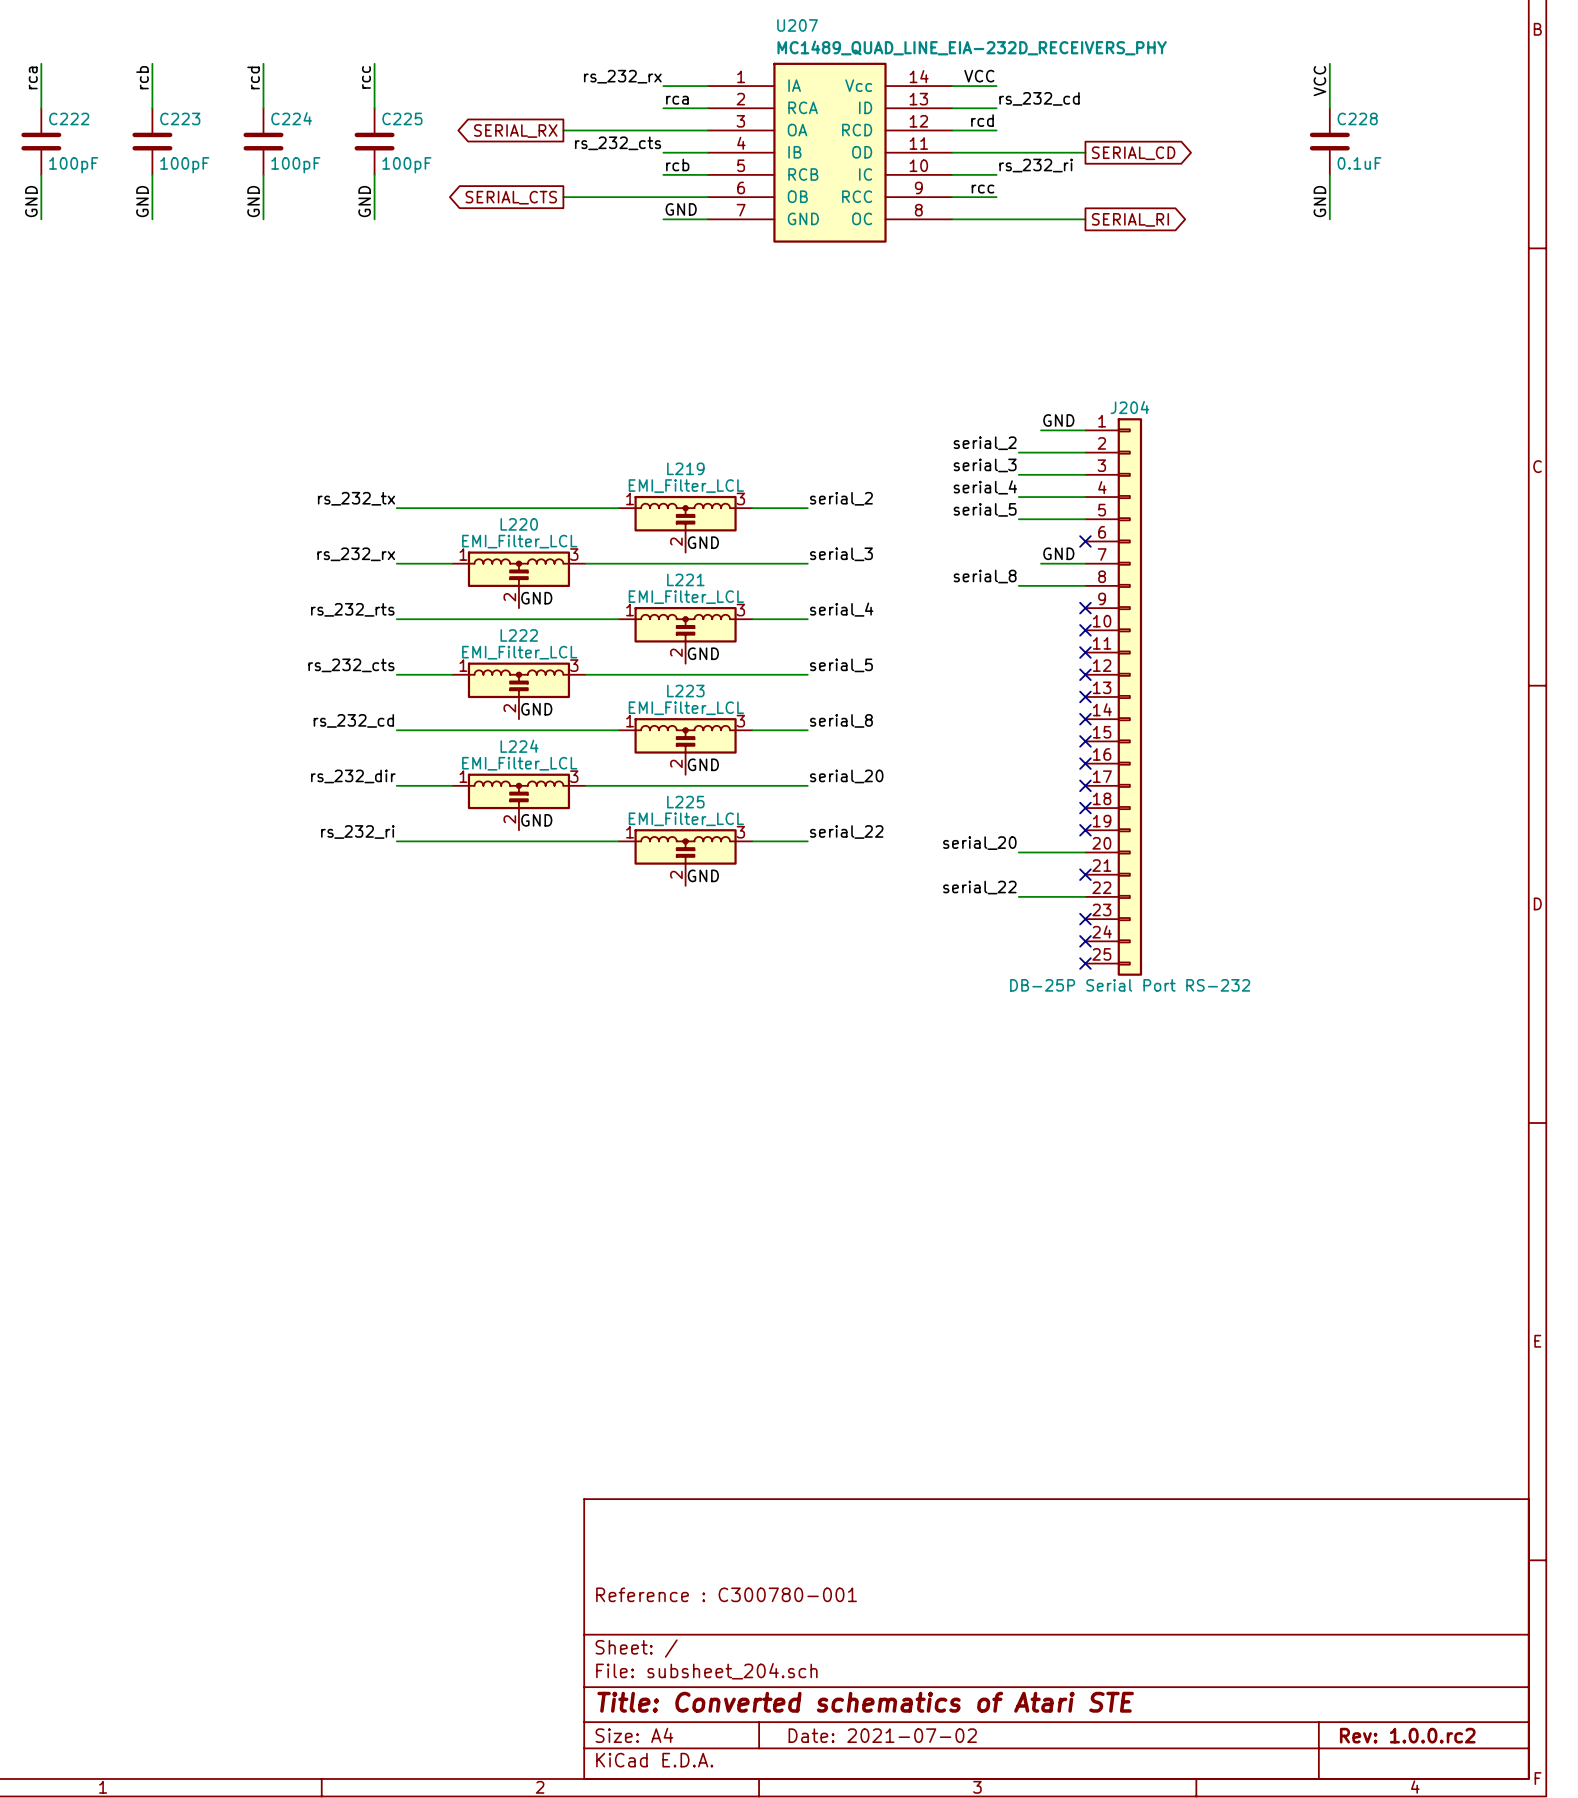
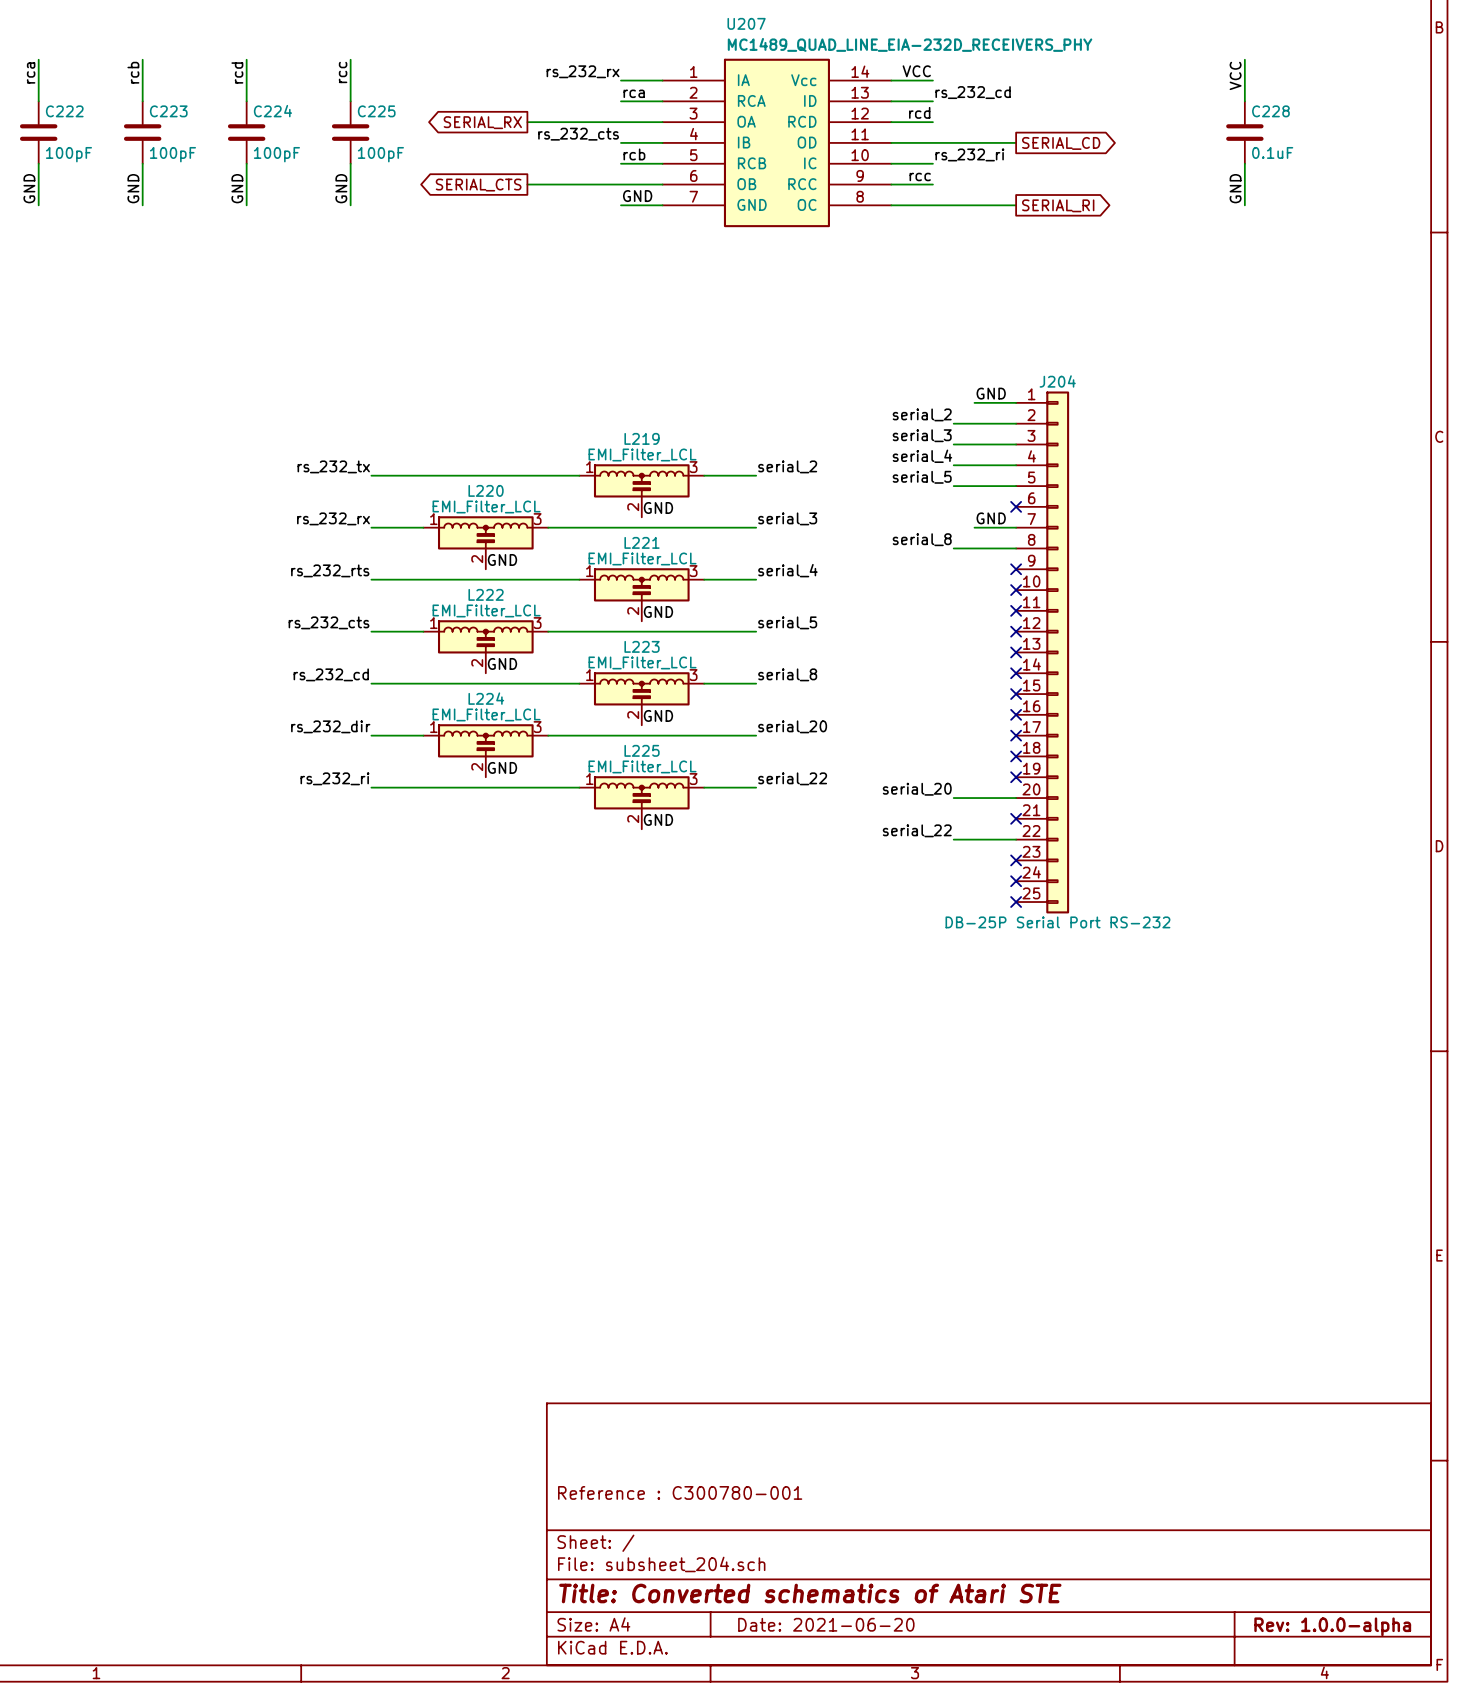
title block: Date: 2021-07-02 (882, 1735) -> Date: 2021-06-20 (826, 1624)
title block: Rev: 1.0.0.rc2 (1407, 1735) -> Rev: 1.0.0-alpha (1332, 1626)

